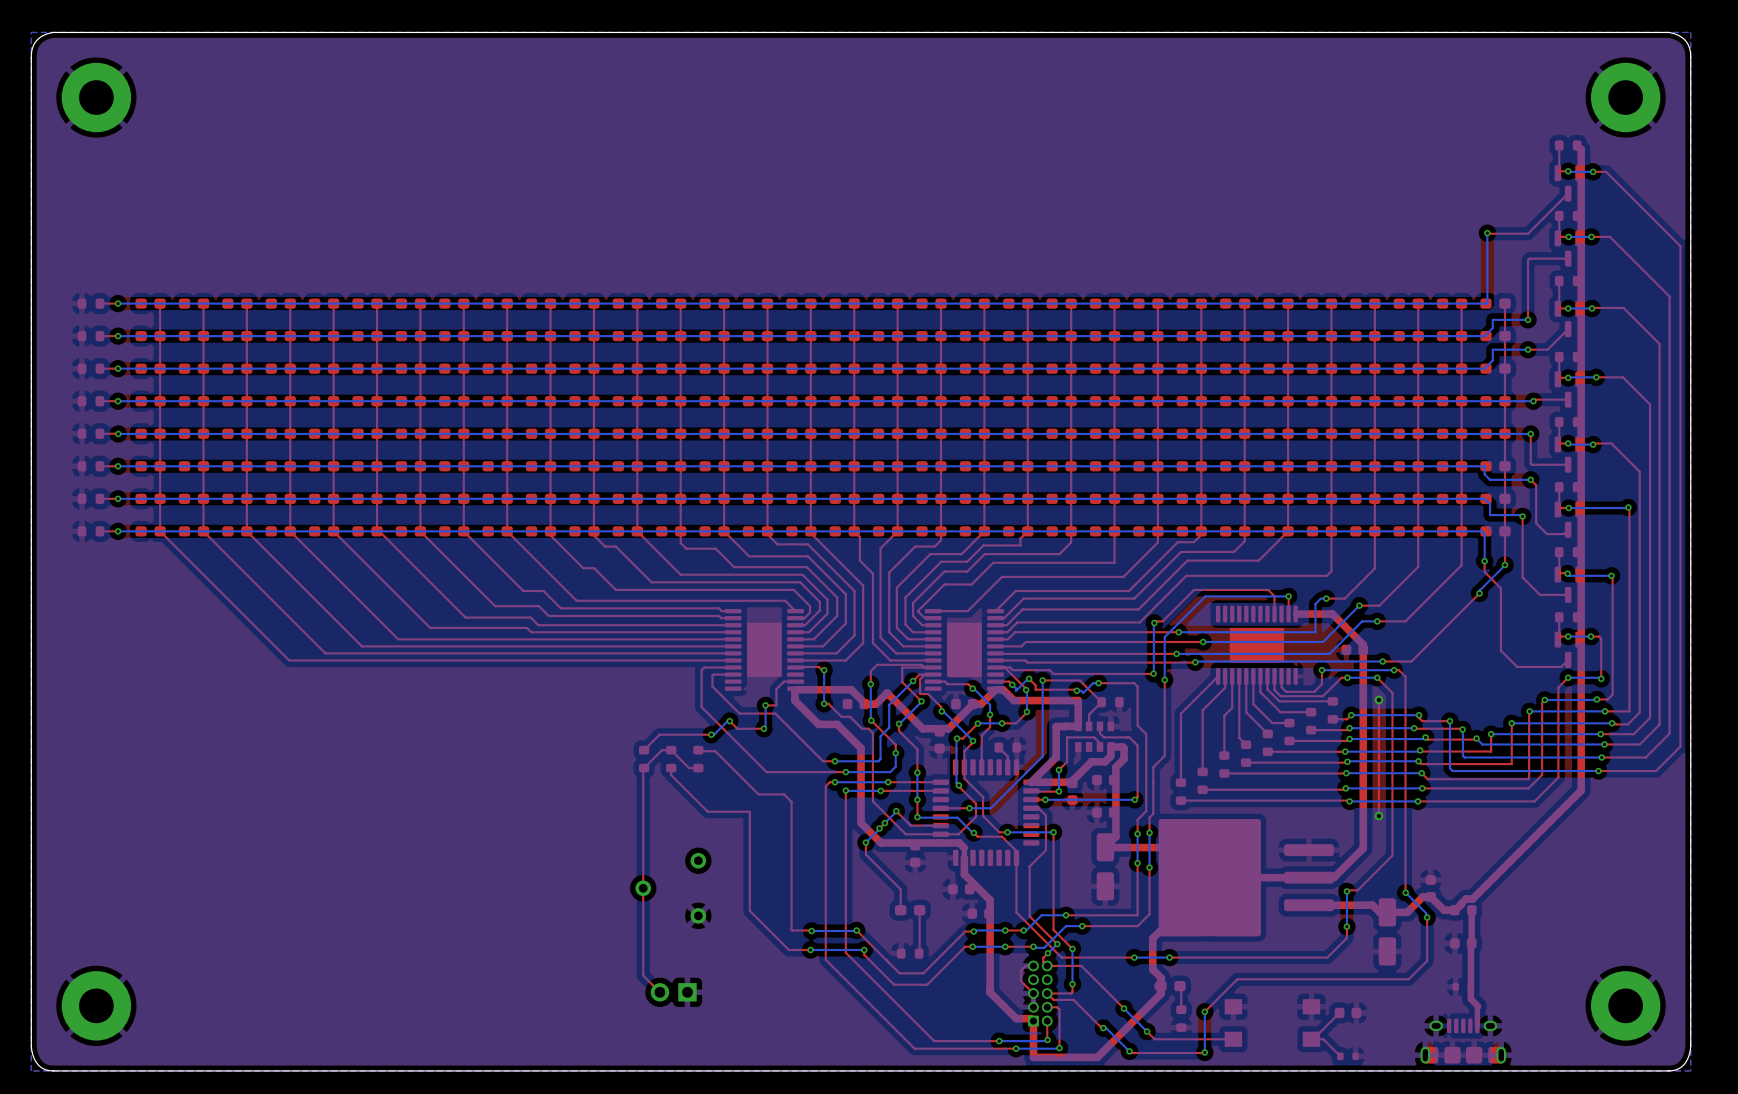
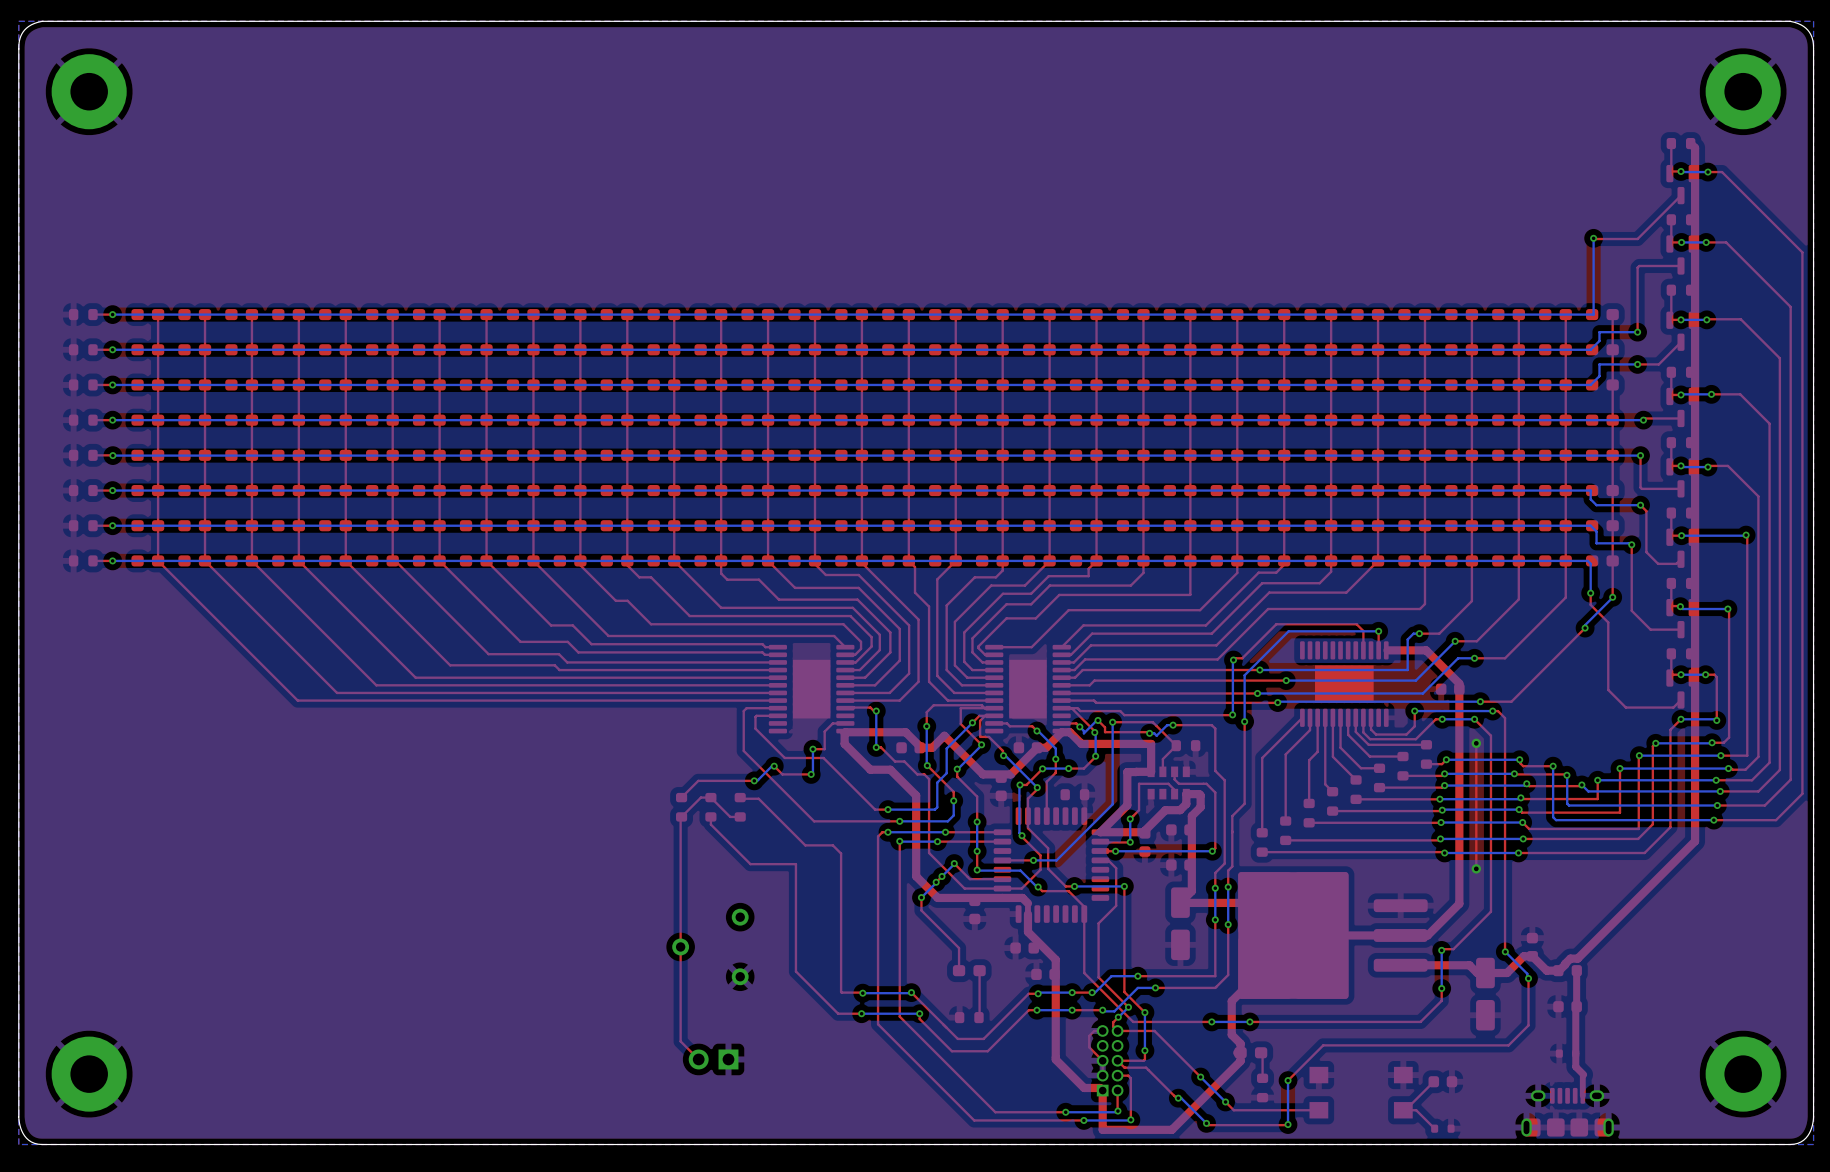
top track: (998, 747) (1007, 756) (1007, 767) -> none

